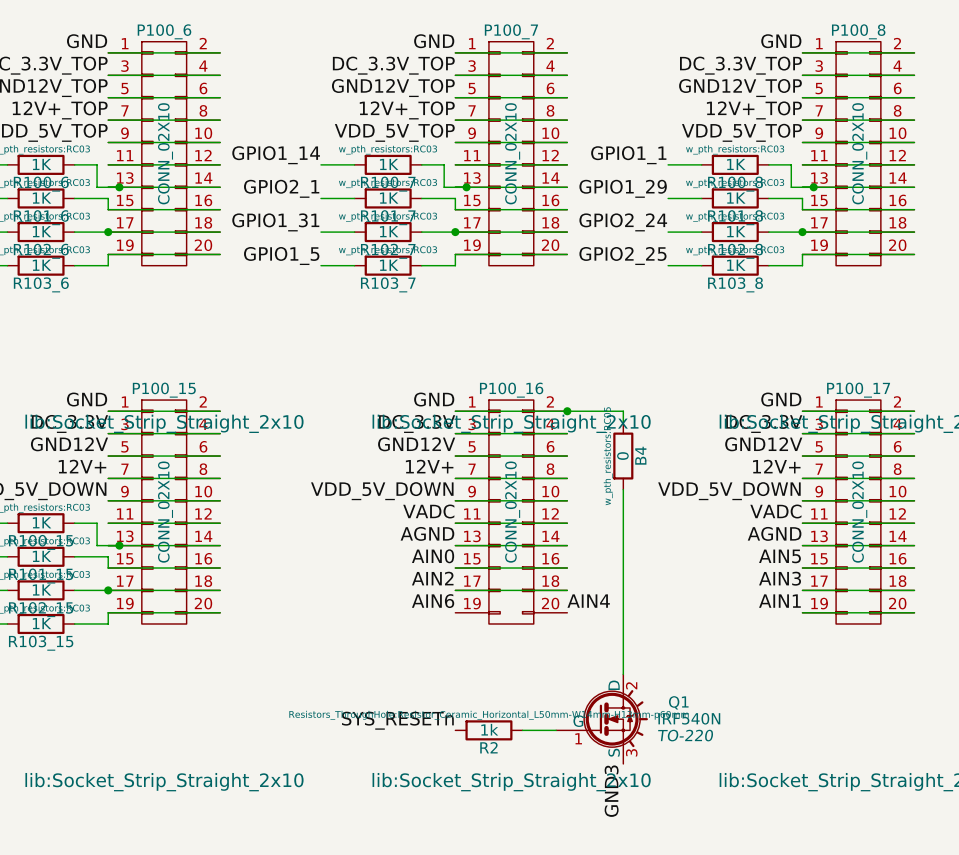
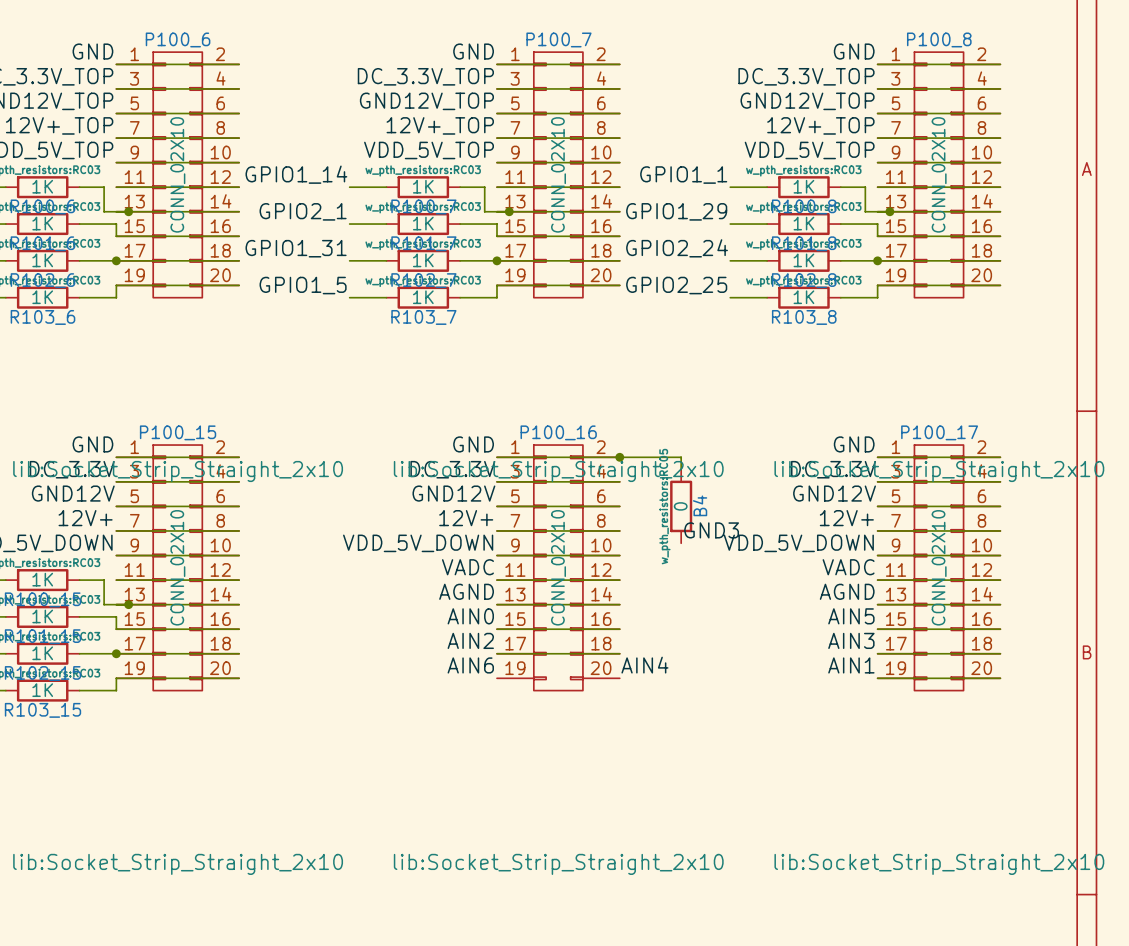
label: none -> GND3 (711, 530)
wire: (623, 489) (623, 674) -> none
Q1: IRF540N (602, 719) -> none
label: SYS_RESETn (397, 720) -> none
R2: 1k (488, 730) -> none
wire: (522, 730) (556, 730) -> none
label: GND3 (611, 791) -> none

